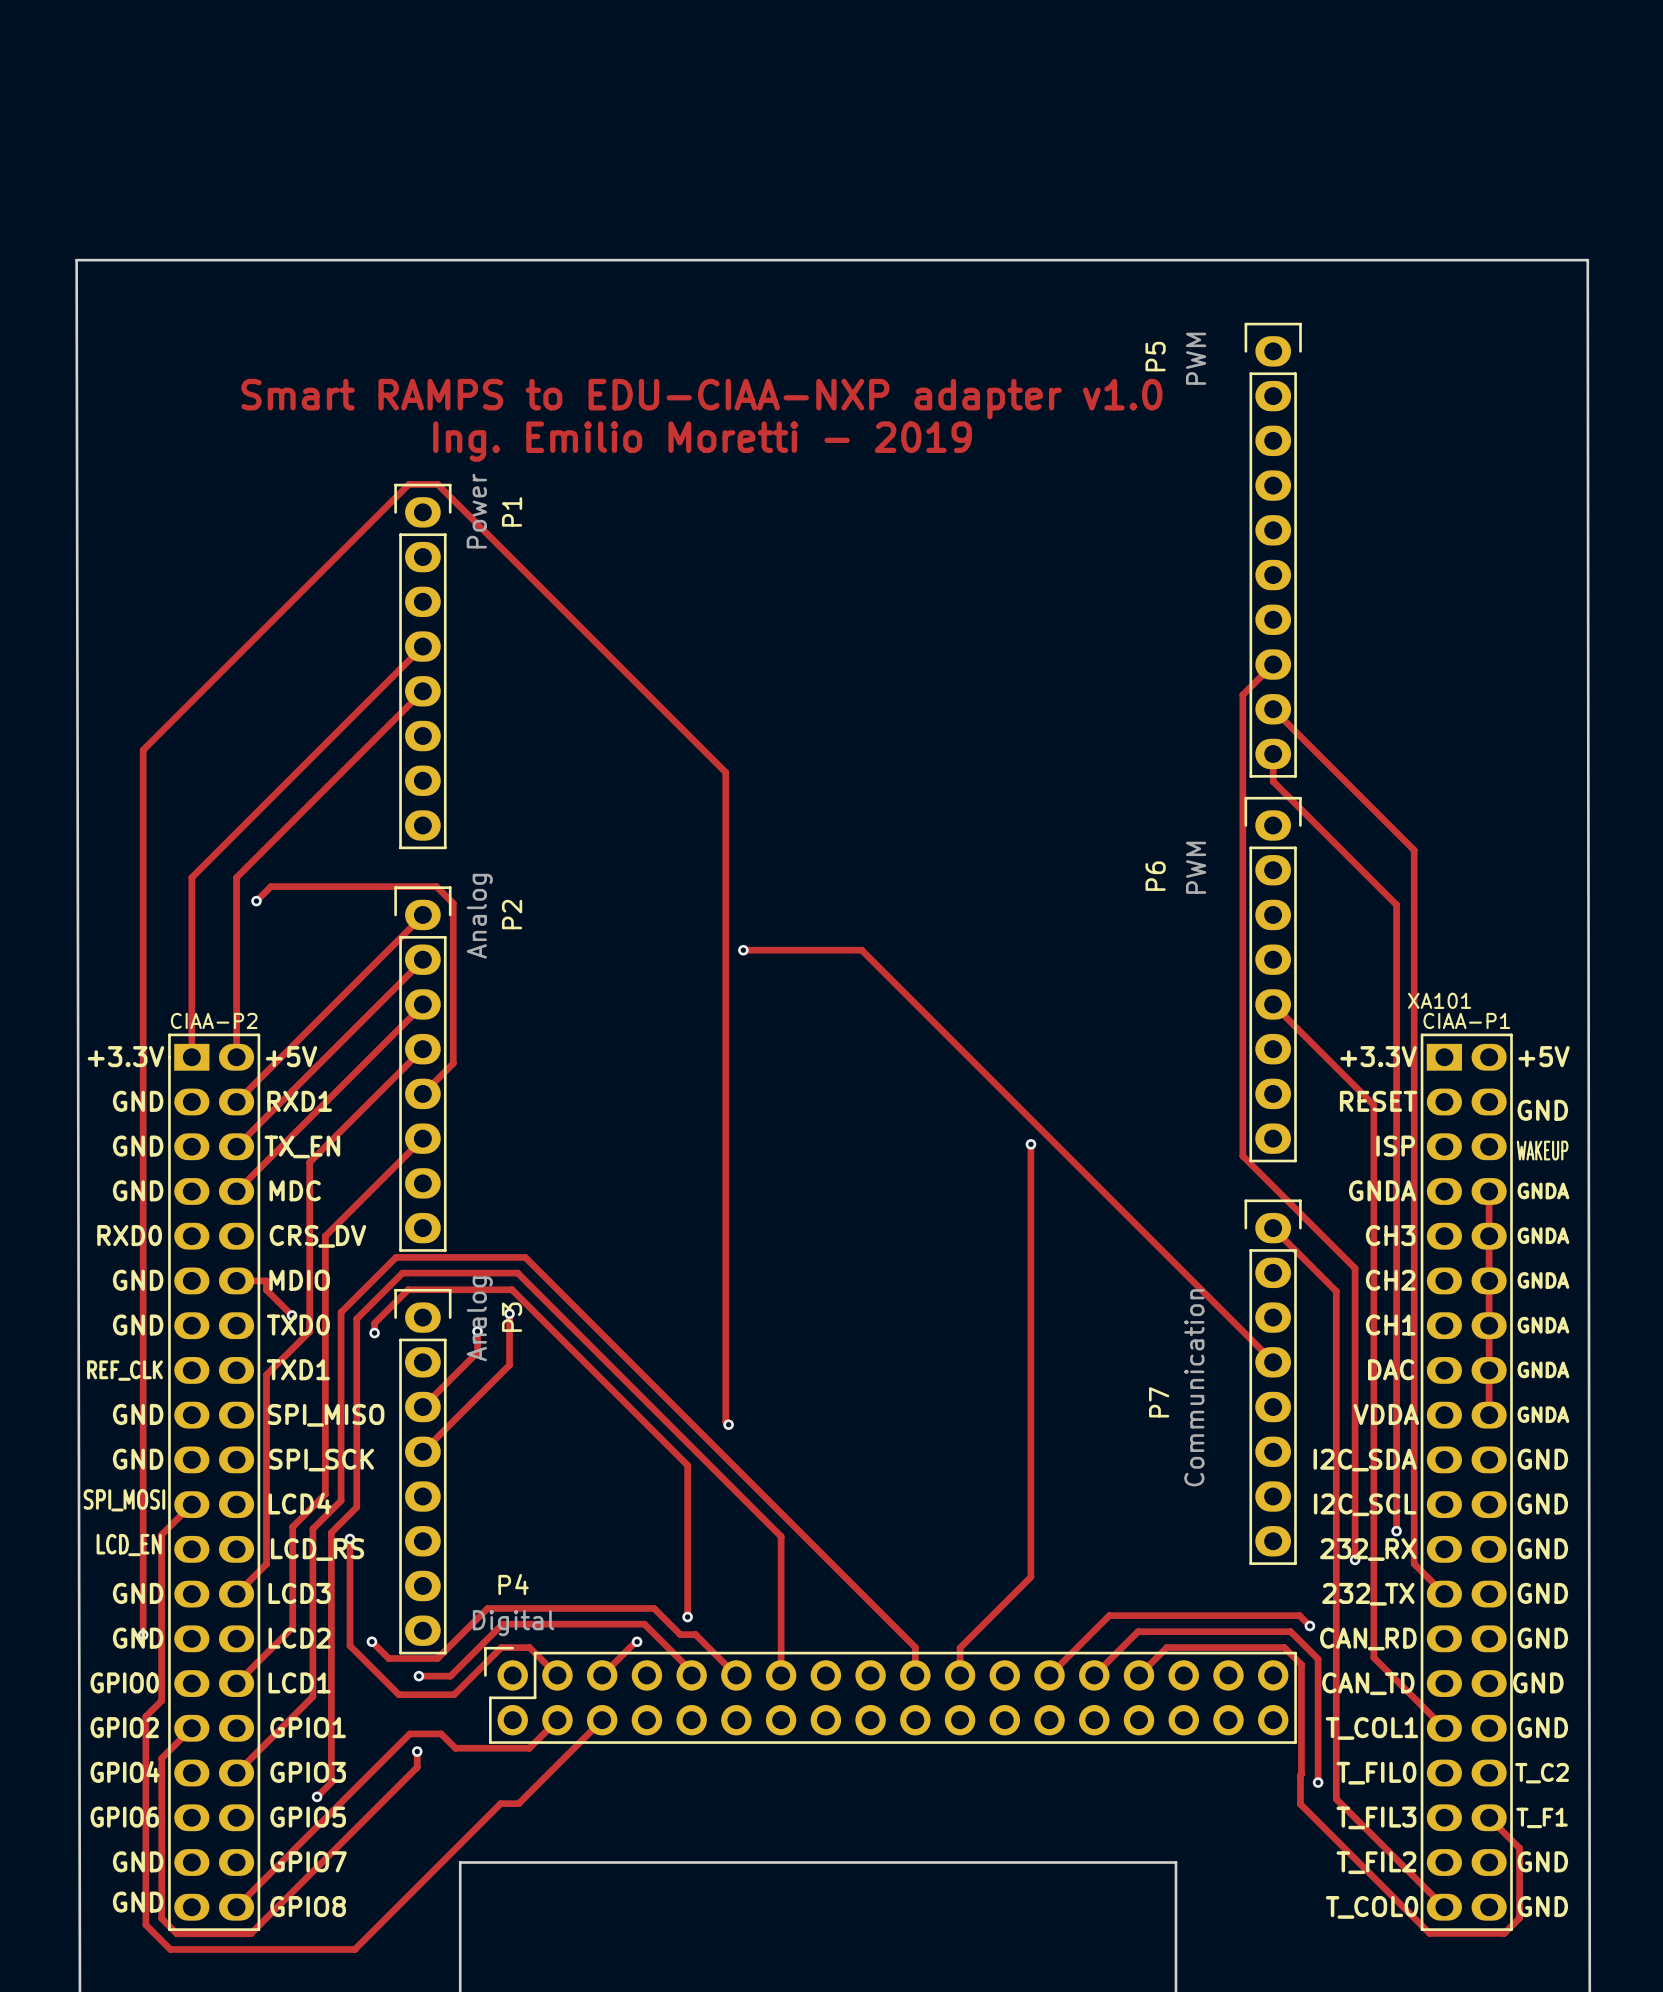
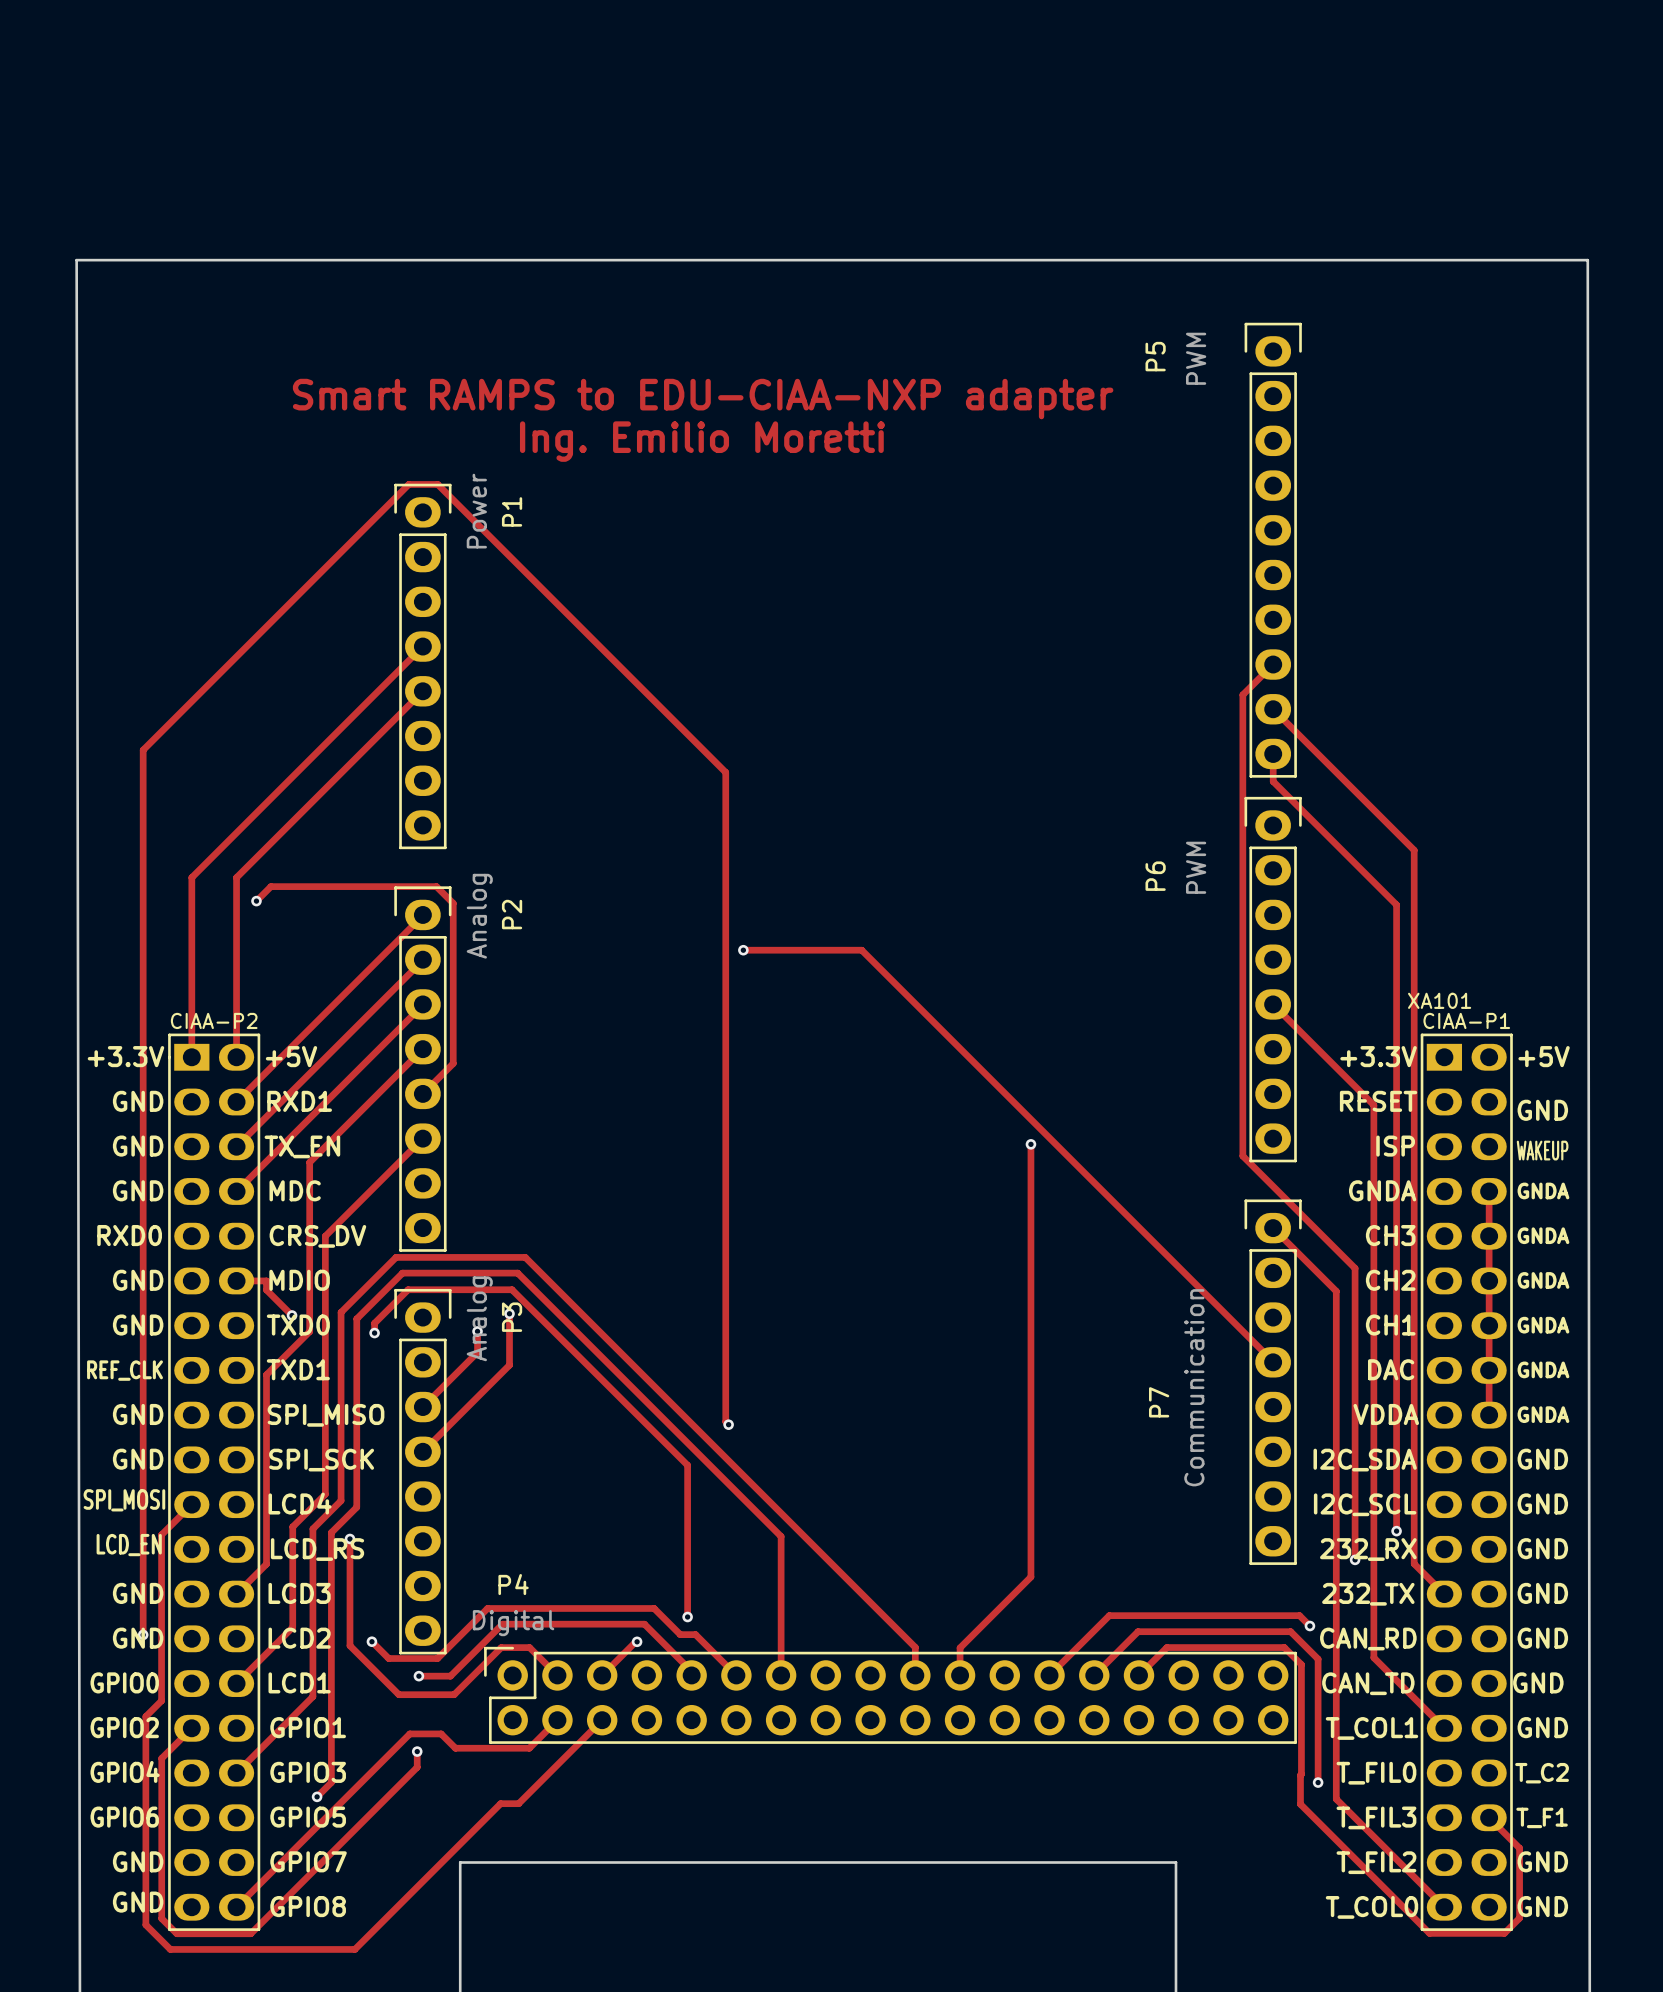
text: Smart RAMPS to EDU-CIAA-NXP adapter v1.0 (701, 399) -> Smart RAMPS to EDU-CIAA-NXP adapter (703, 399)
text: Ing. Emilio Moretti - 2019 (702, 441) -> Ing. Emilio Moretti (702, 441)

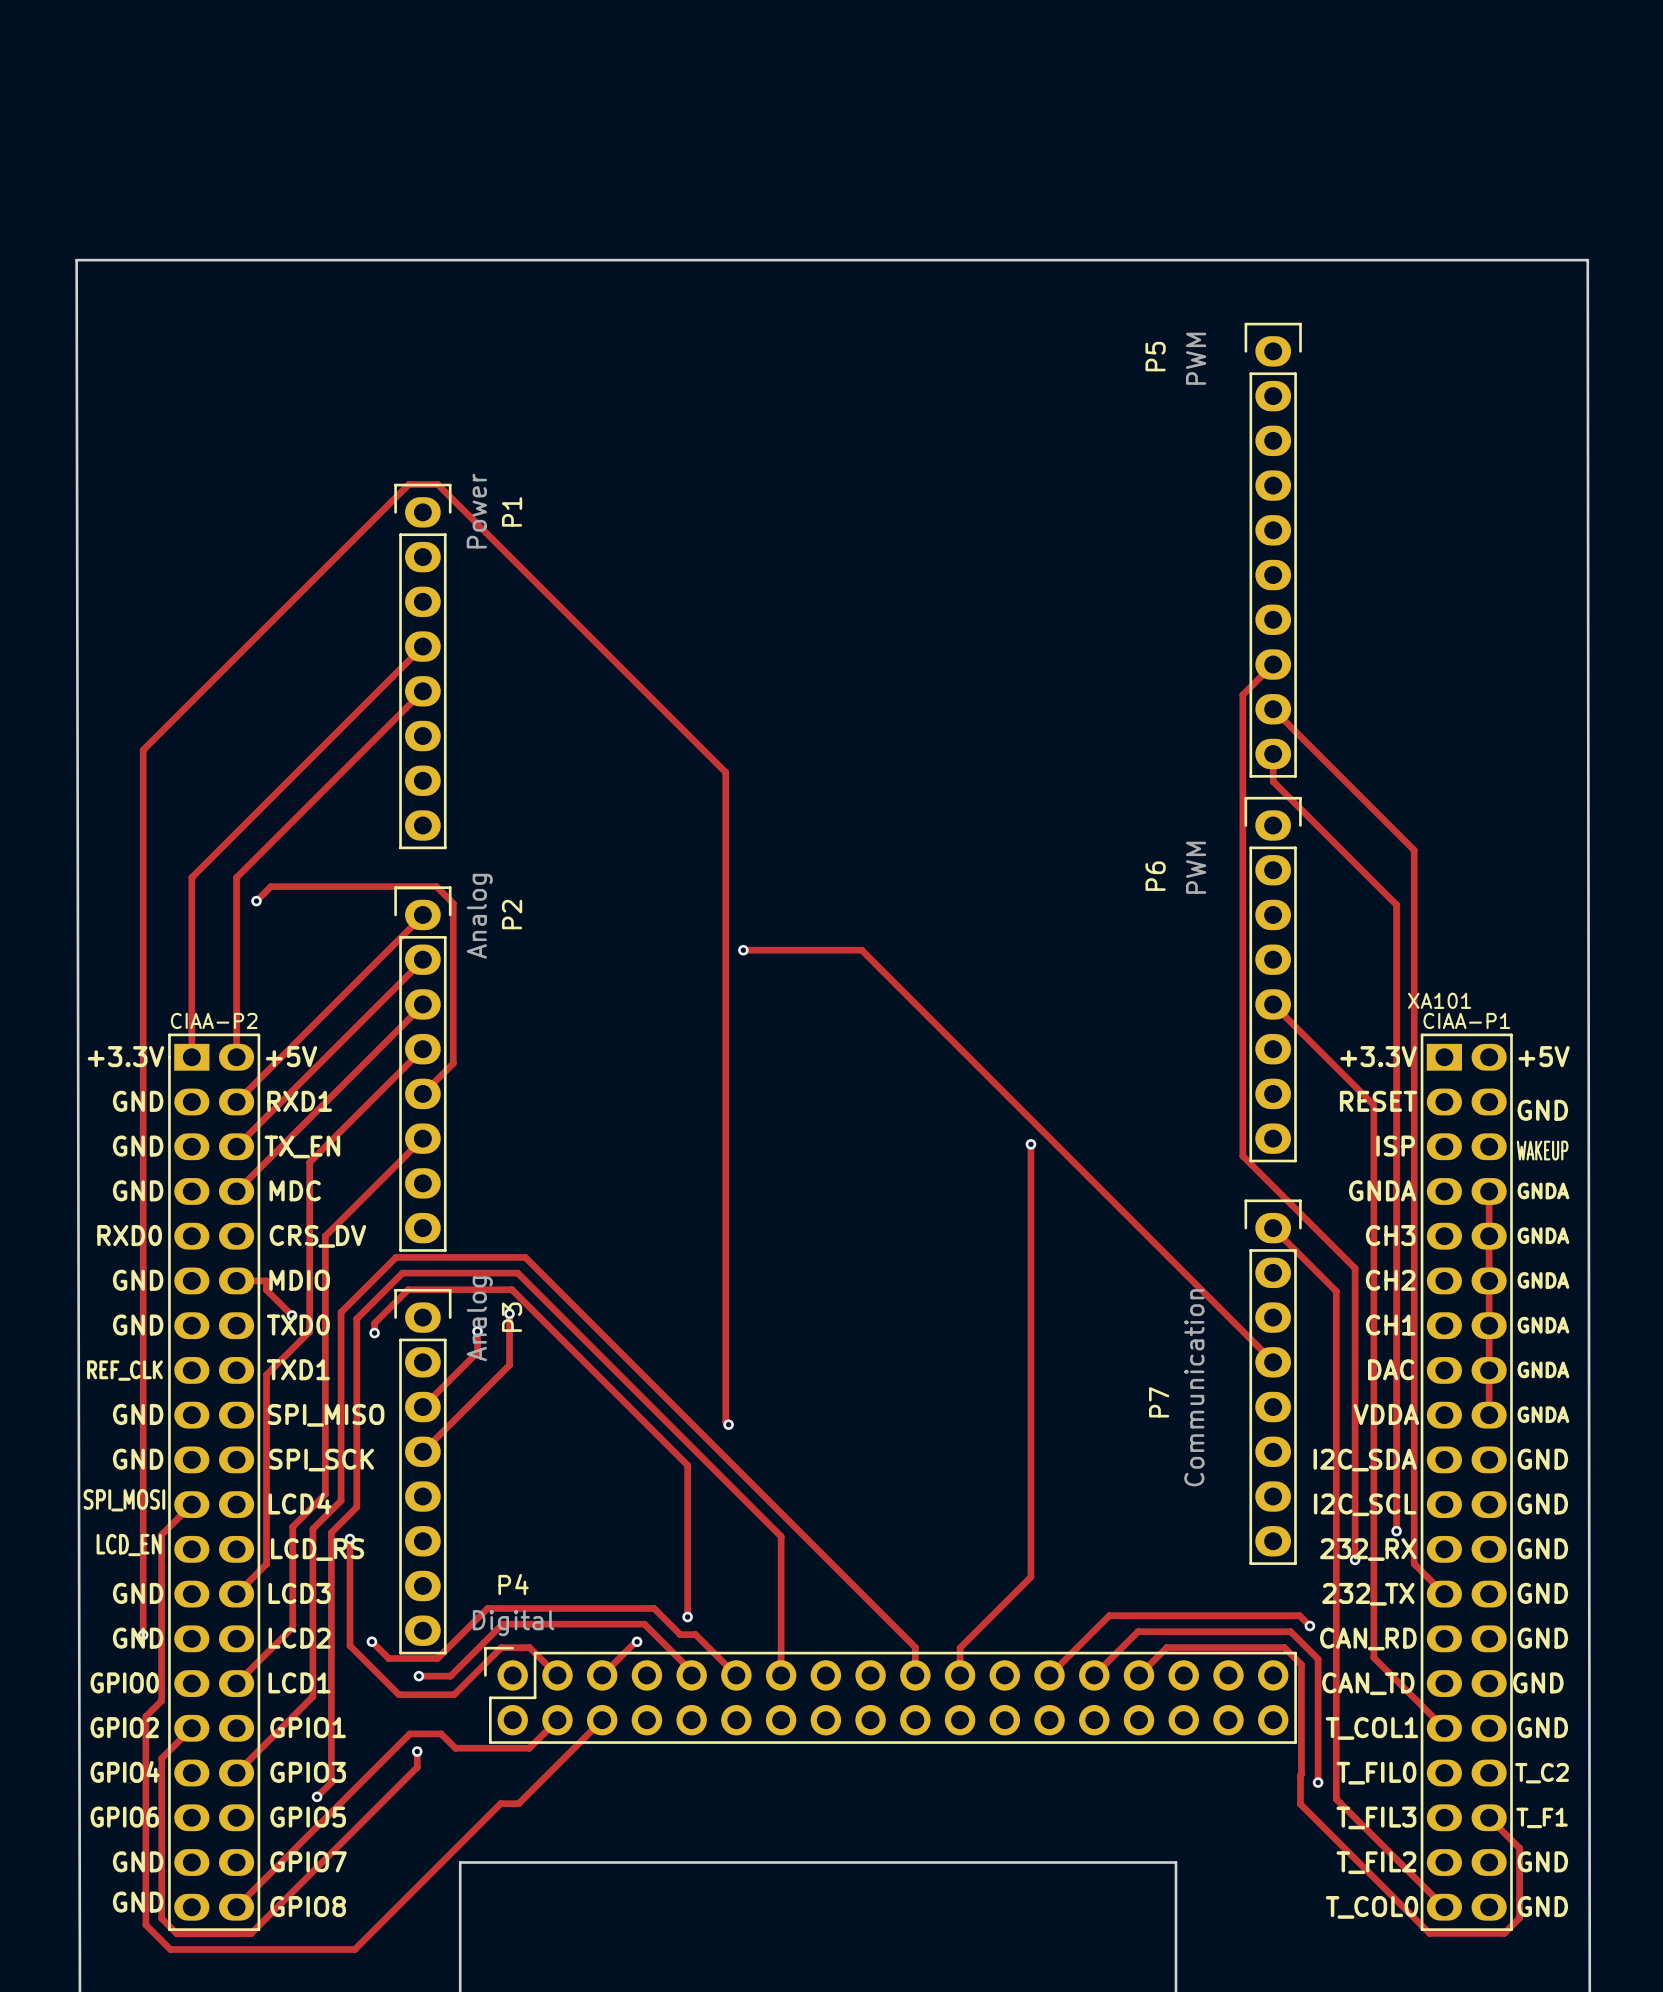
text: Smart RAMPS to EDU-CIAA-NXP adapter (703, 399) -> none
text: Ing. Emilio Moretti (702, 441) -> none

